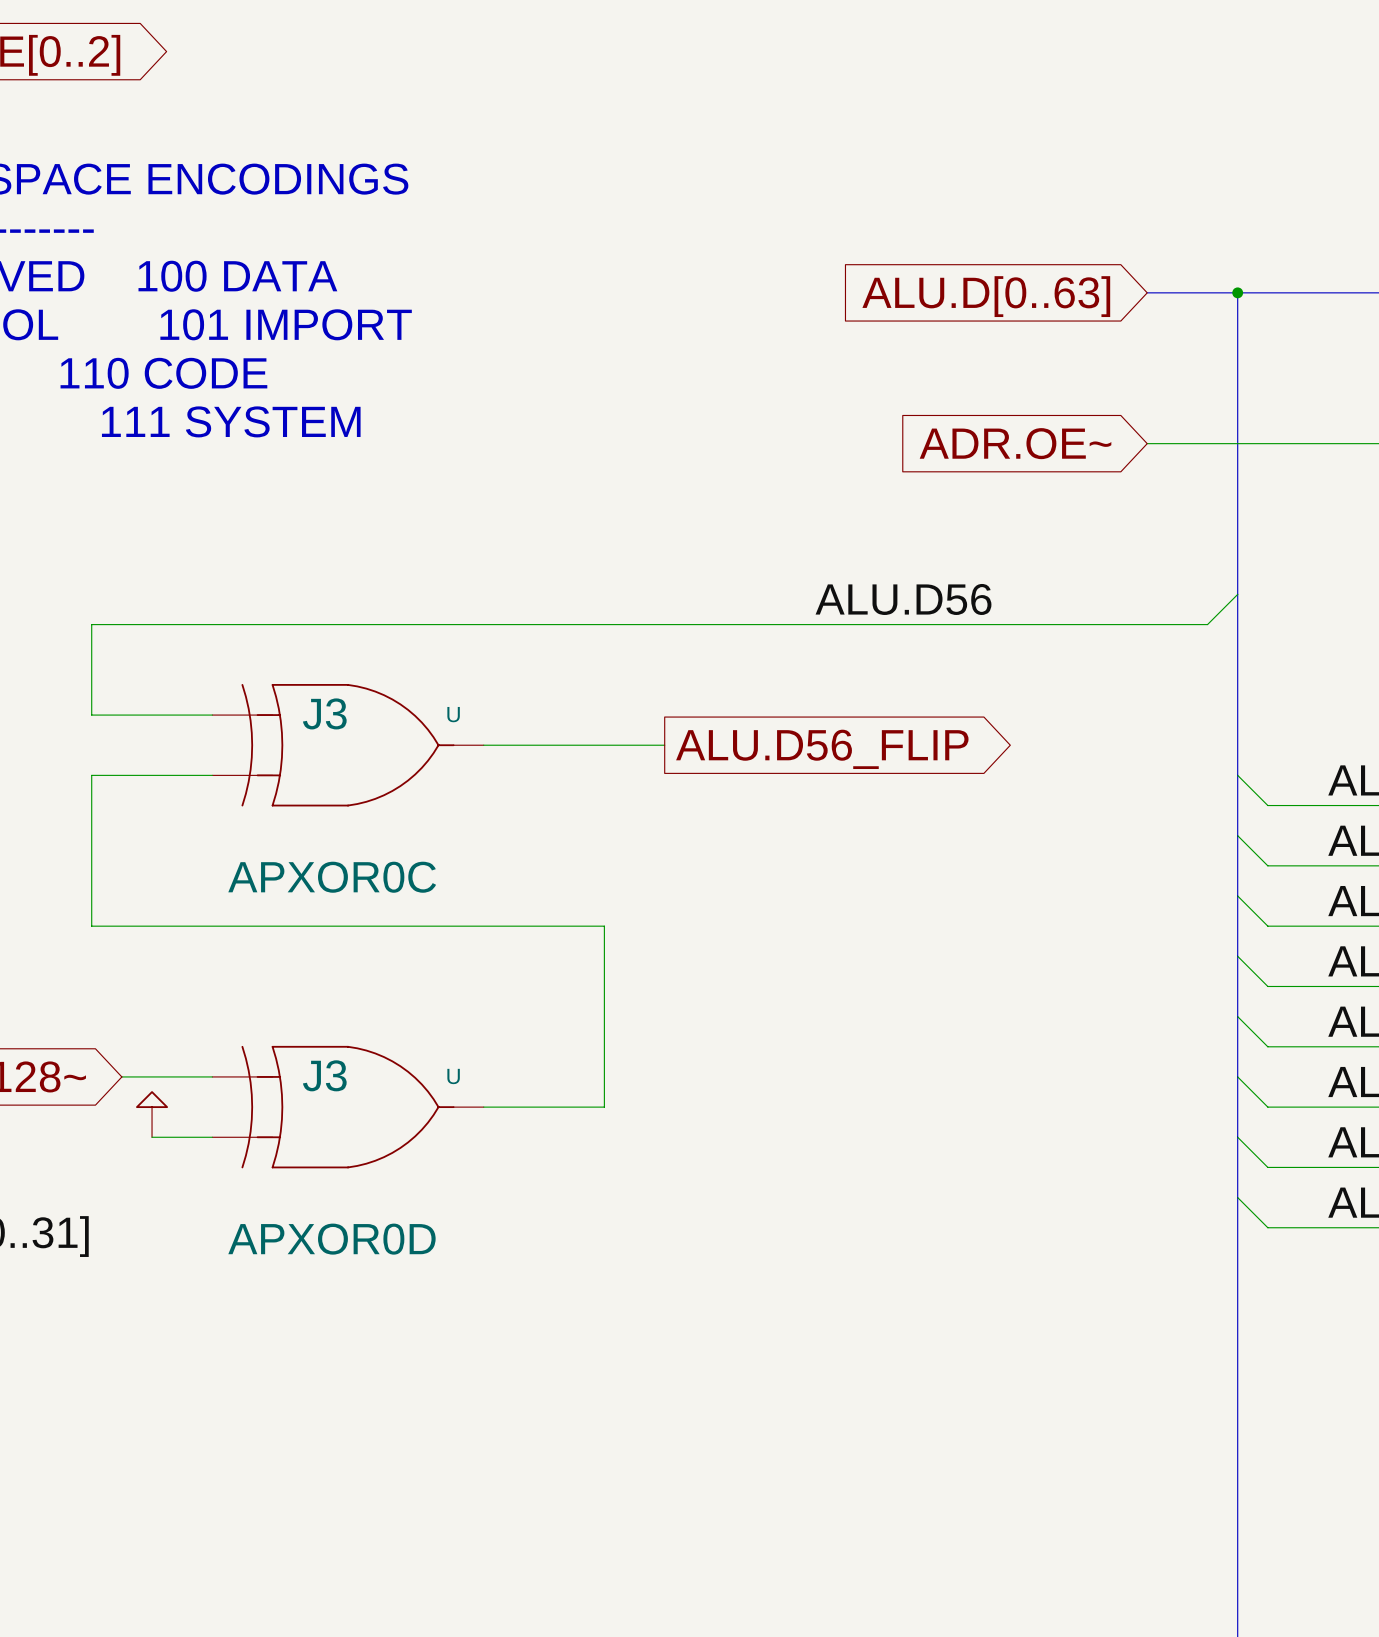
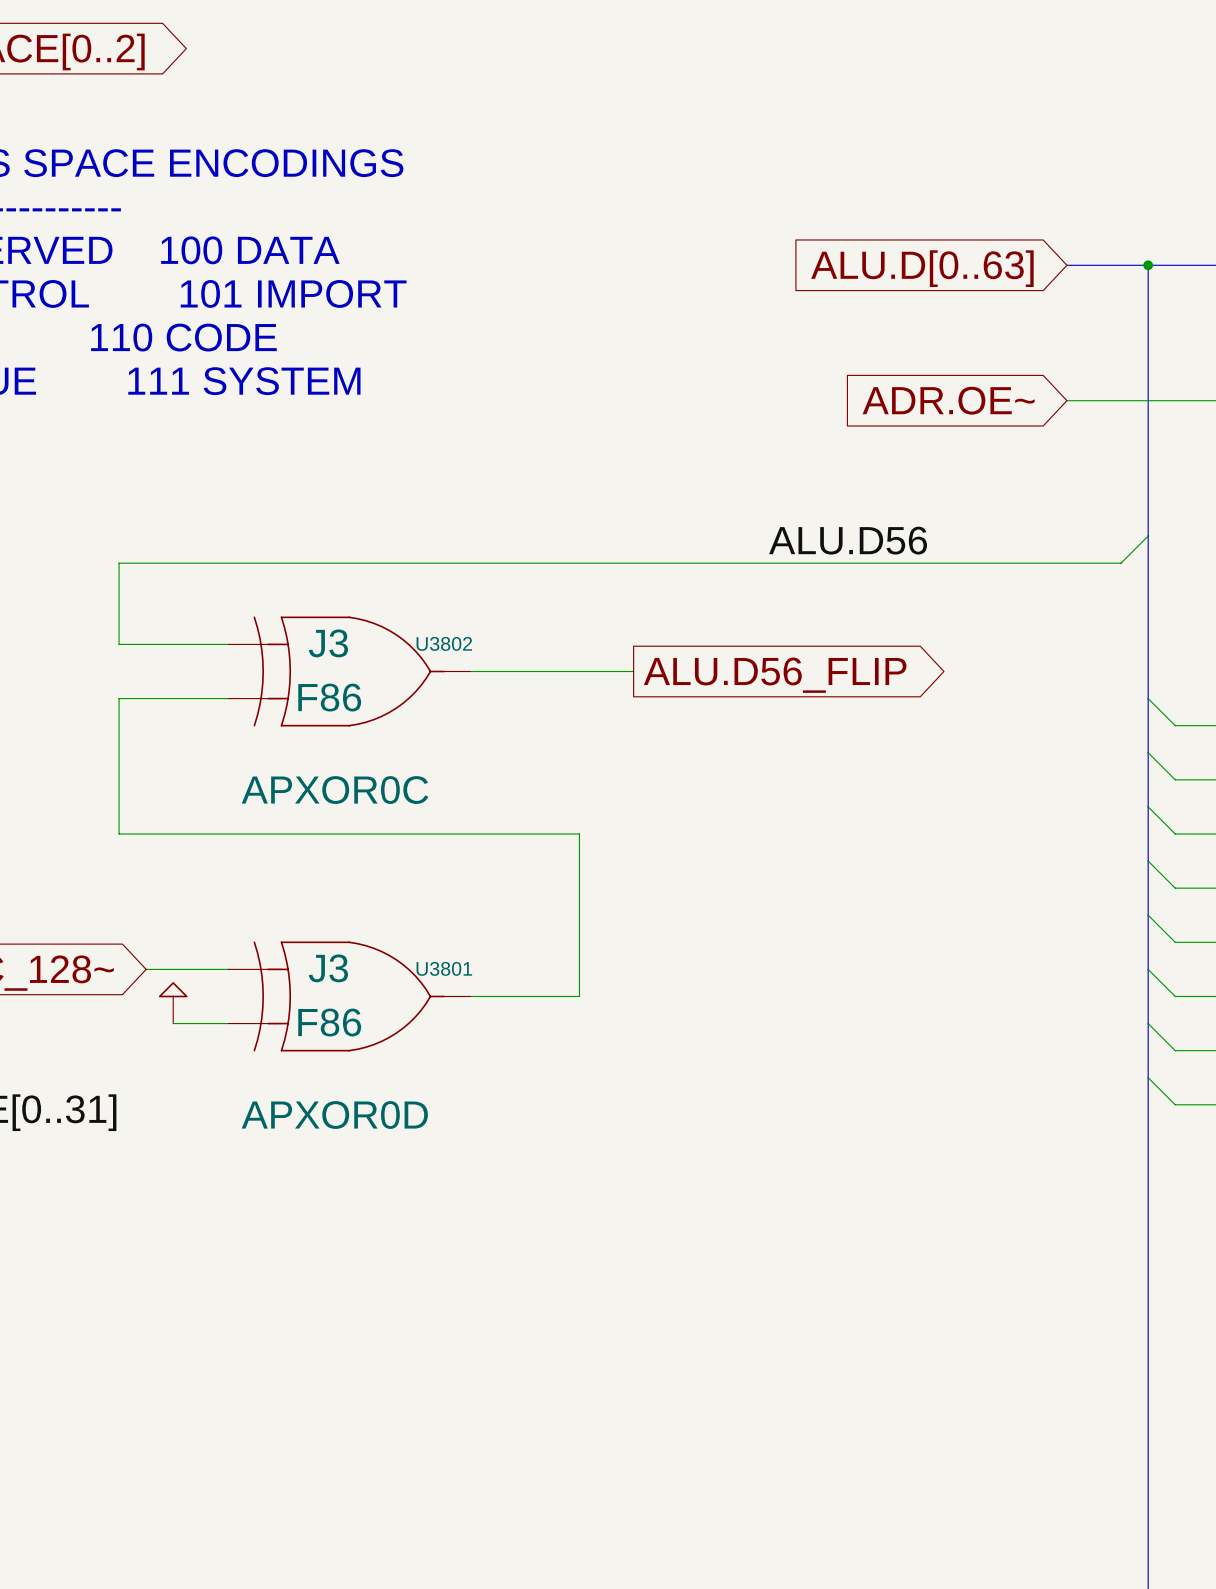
U name: U (453, 714) -> U3802 (444, 643)
U value: none -> F86 (329, 697)
U name: U (453, 1076) -> U3801 (444, 968)
U value: none -> F86 (329, 1022)

